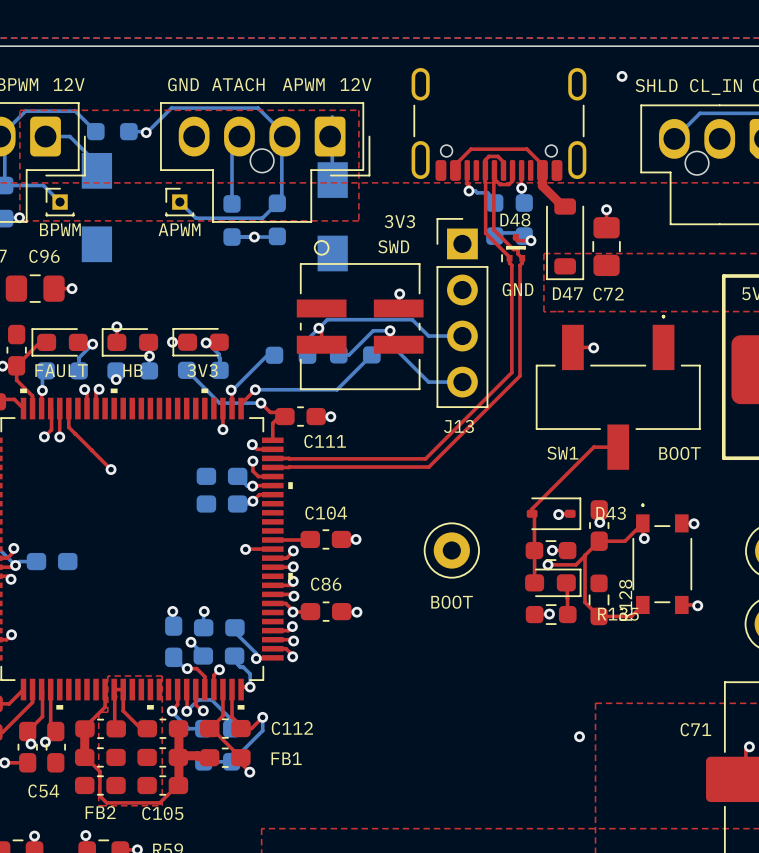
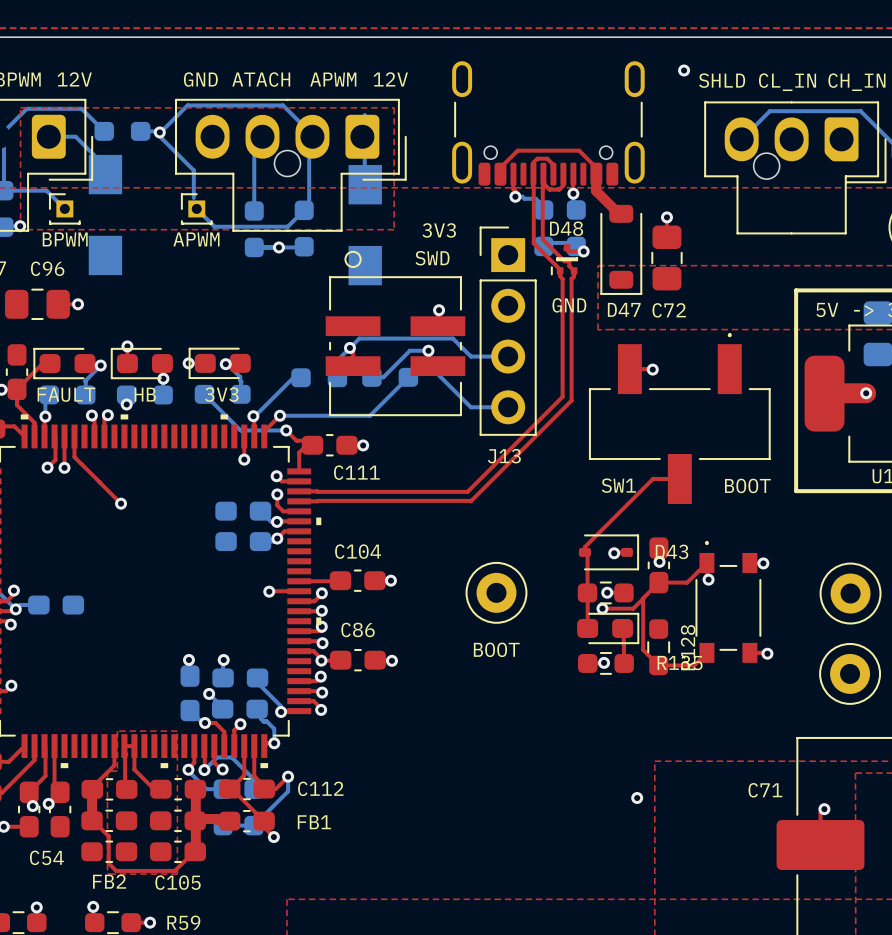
bottom track: none -> (159, 136) (193, 170) (193, 198)

